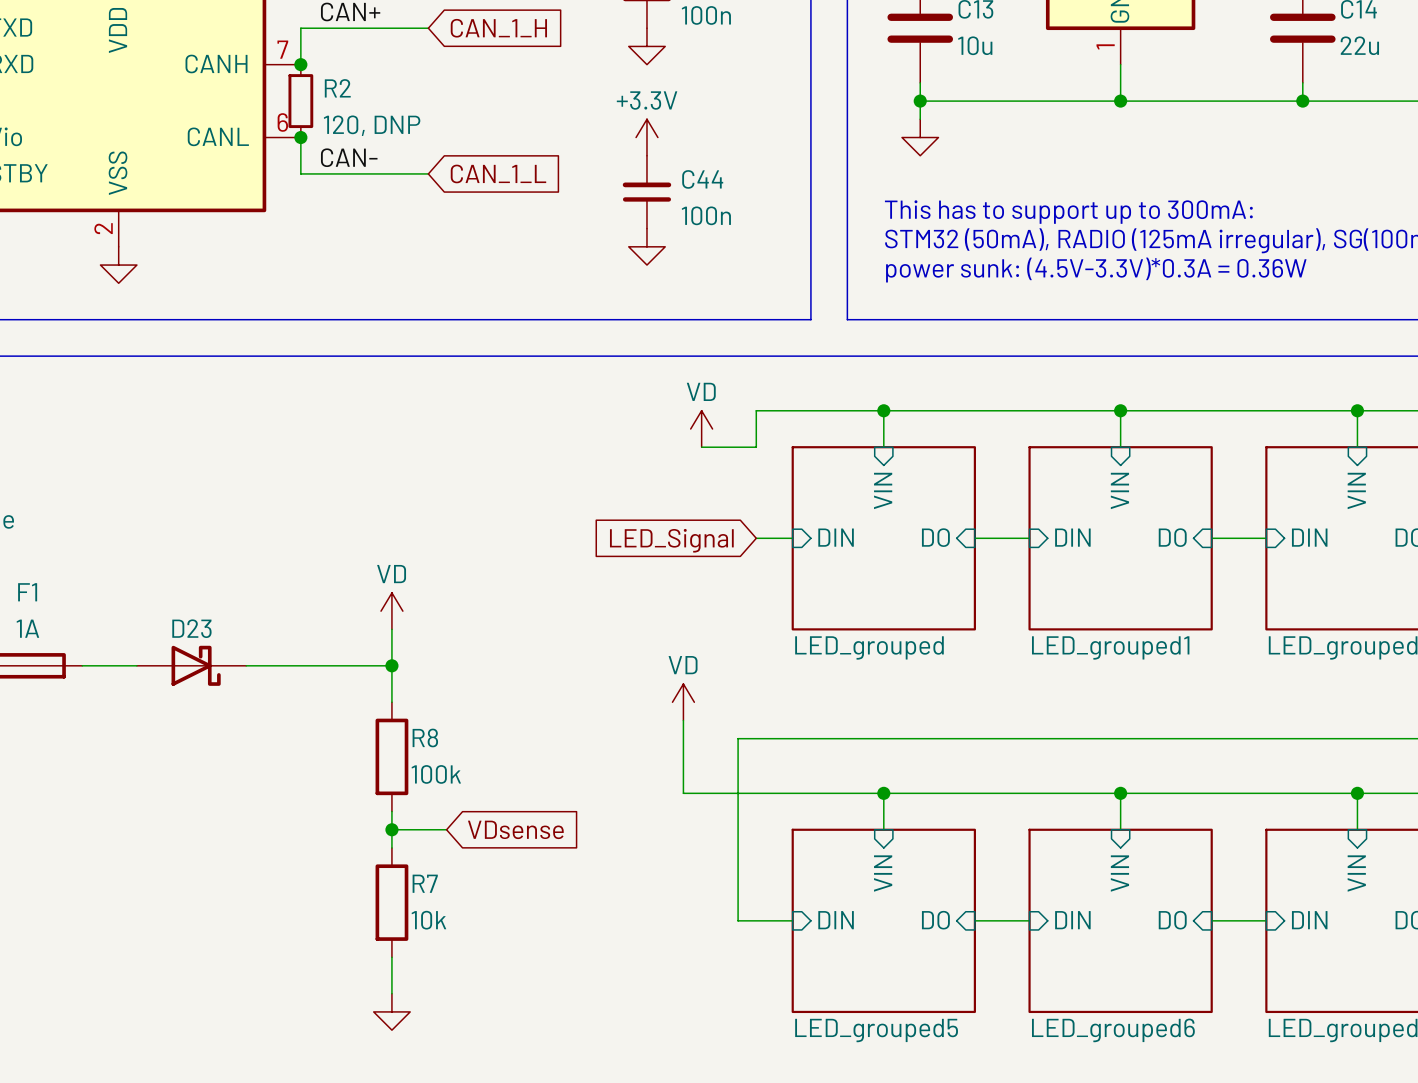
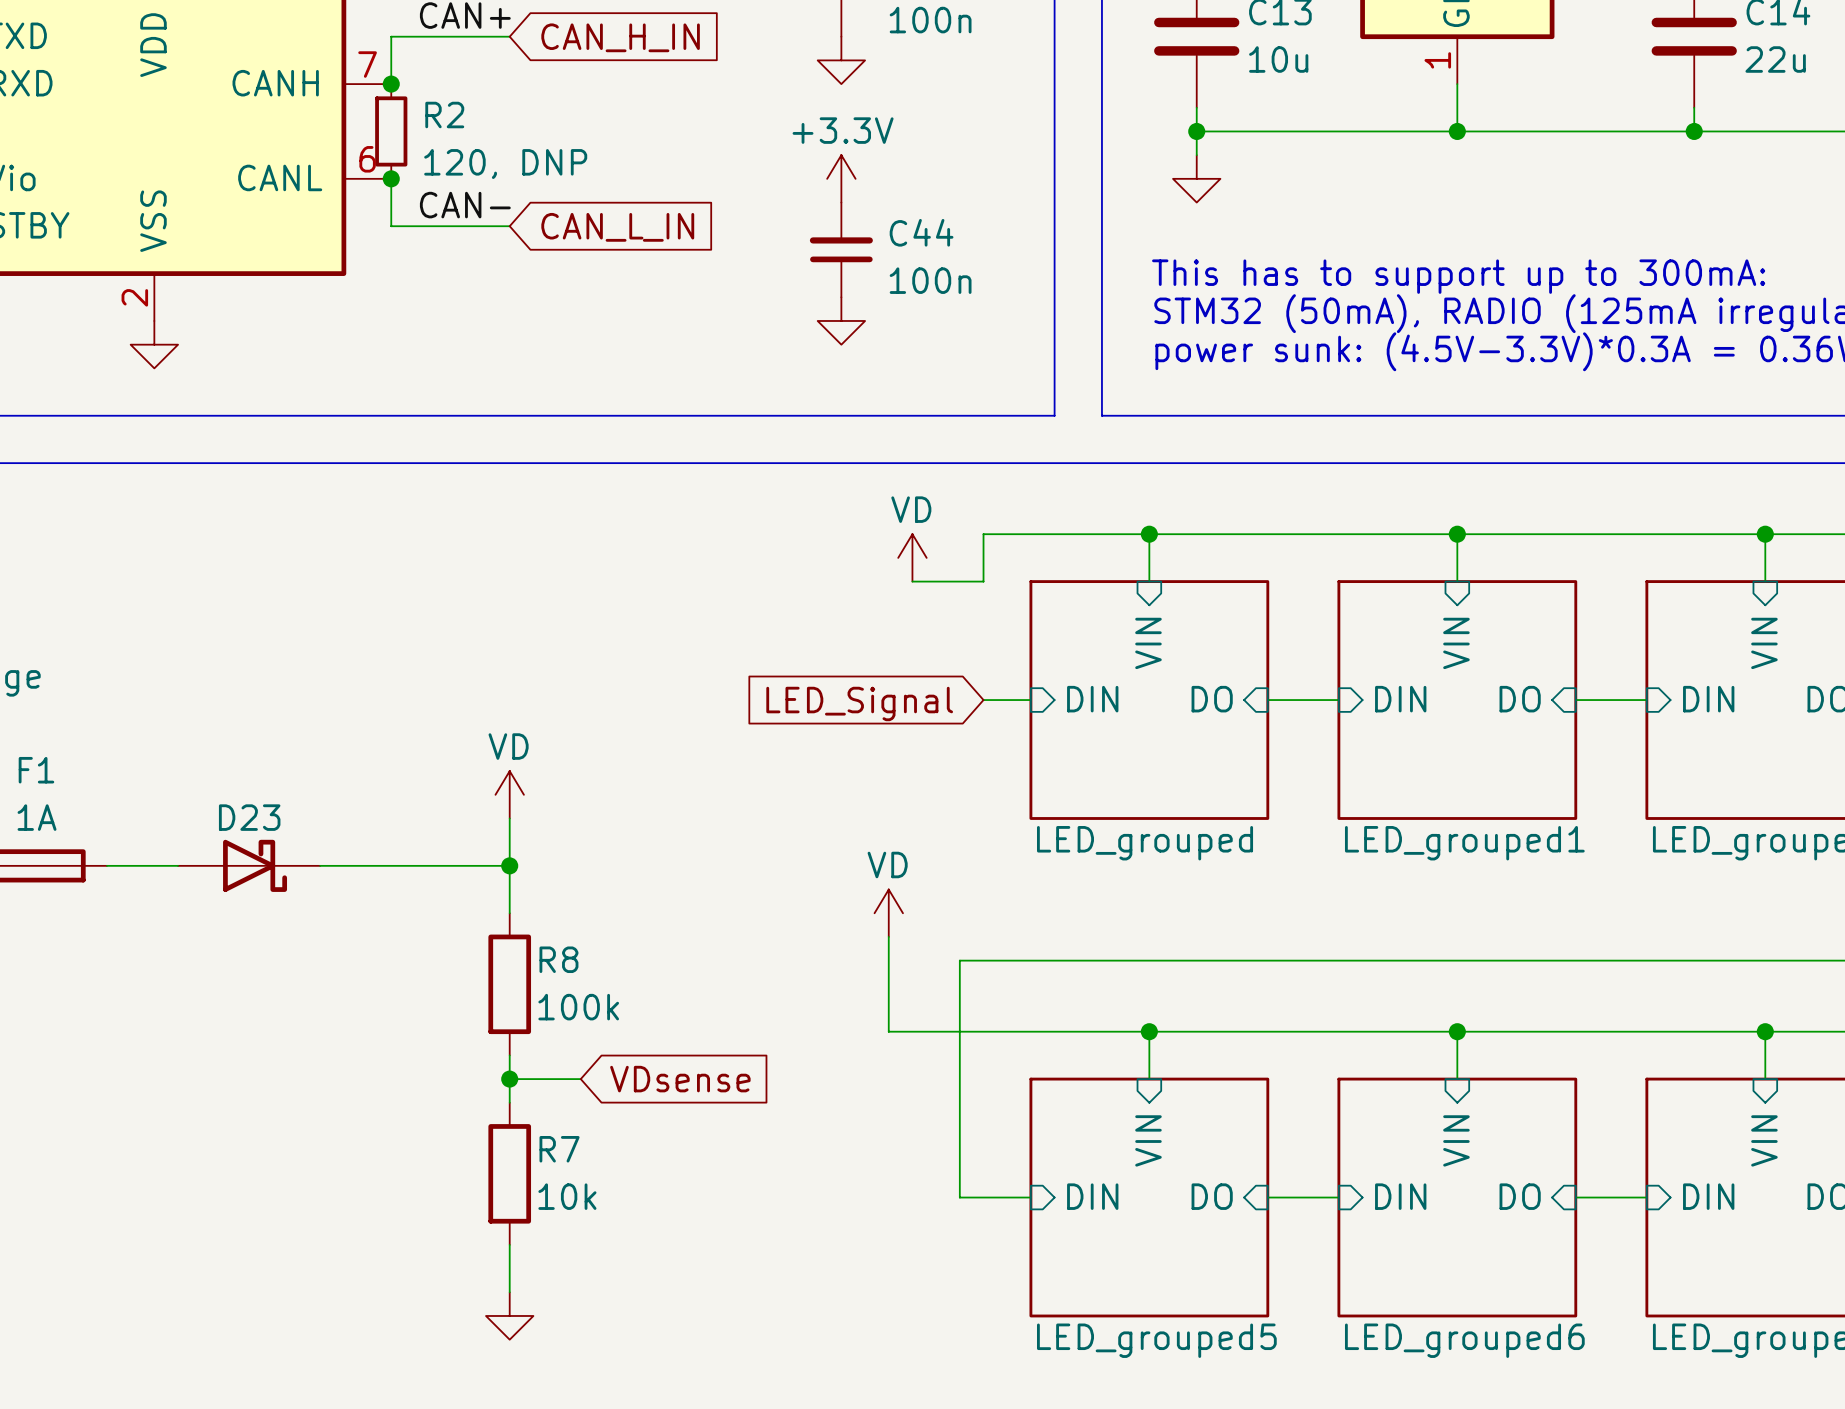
wire: (391, 28) (428, 28) -> none
global label: CAN_1_H (498, 28) -> CAN_H_IN (620, 37)
wire: (391, 173) (428, 173) -> none
global label: CAN_1_L (498, 173) -> CAN_L_IN (617, 227)

